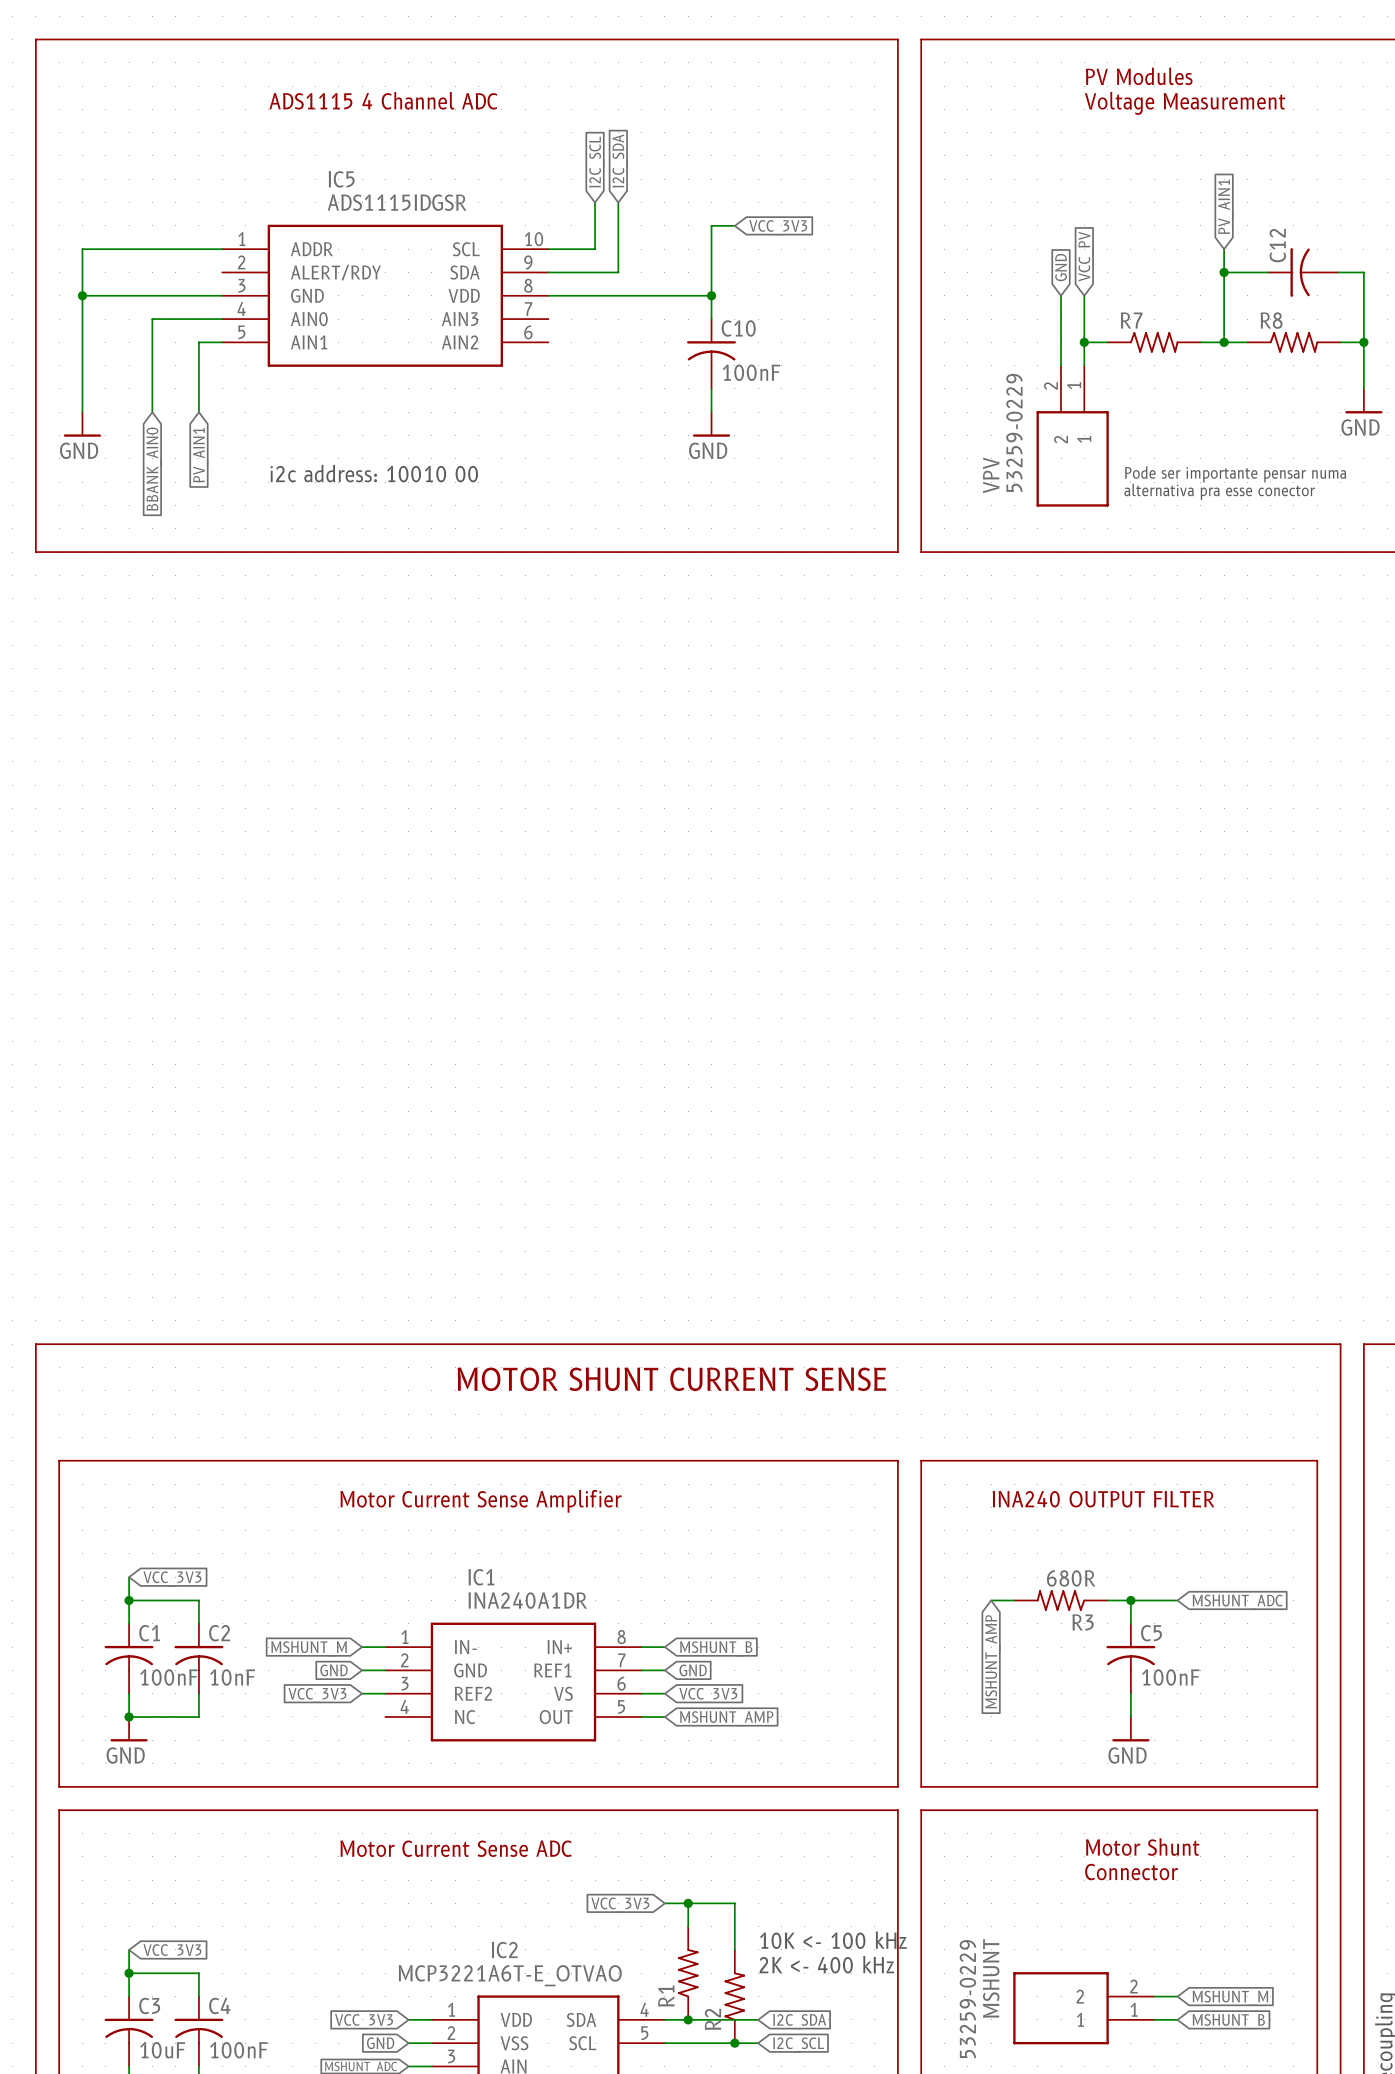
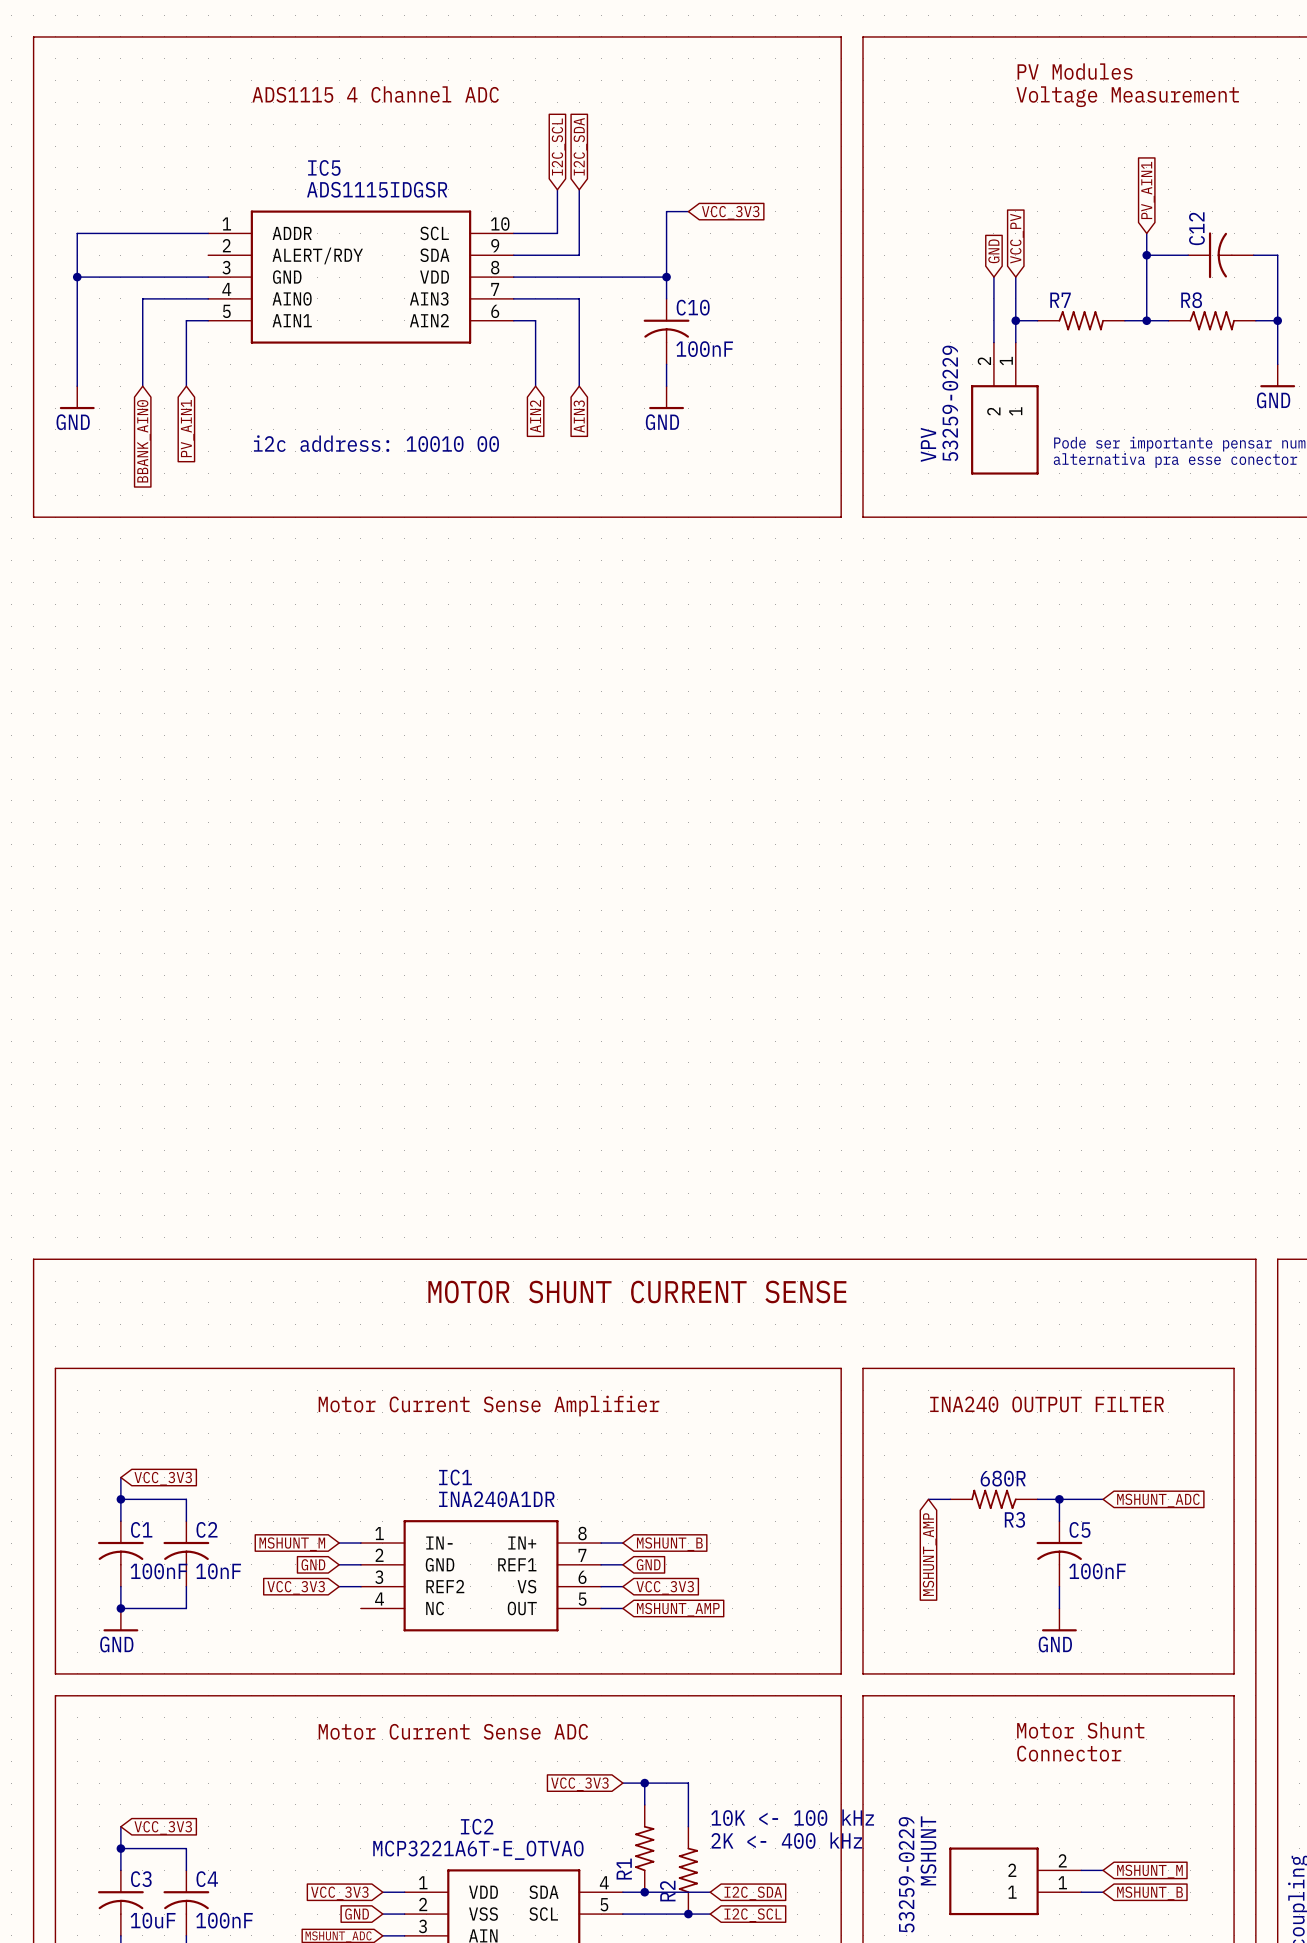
wire: none -> (513, 298) (579, 298) (579, 386)
wire: none -> (513, 320) (535, 320) (535, 386)
global label: none -> AIN2 (535, 416)
global label: none -> AIN3 (579, 416)

